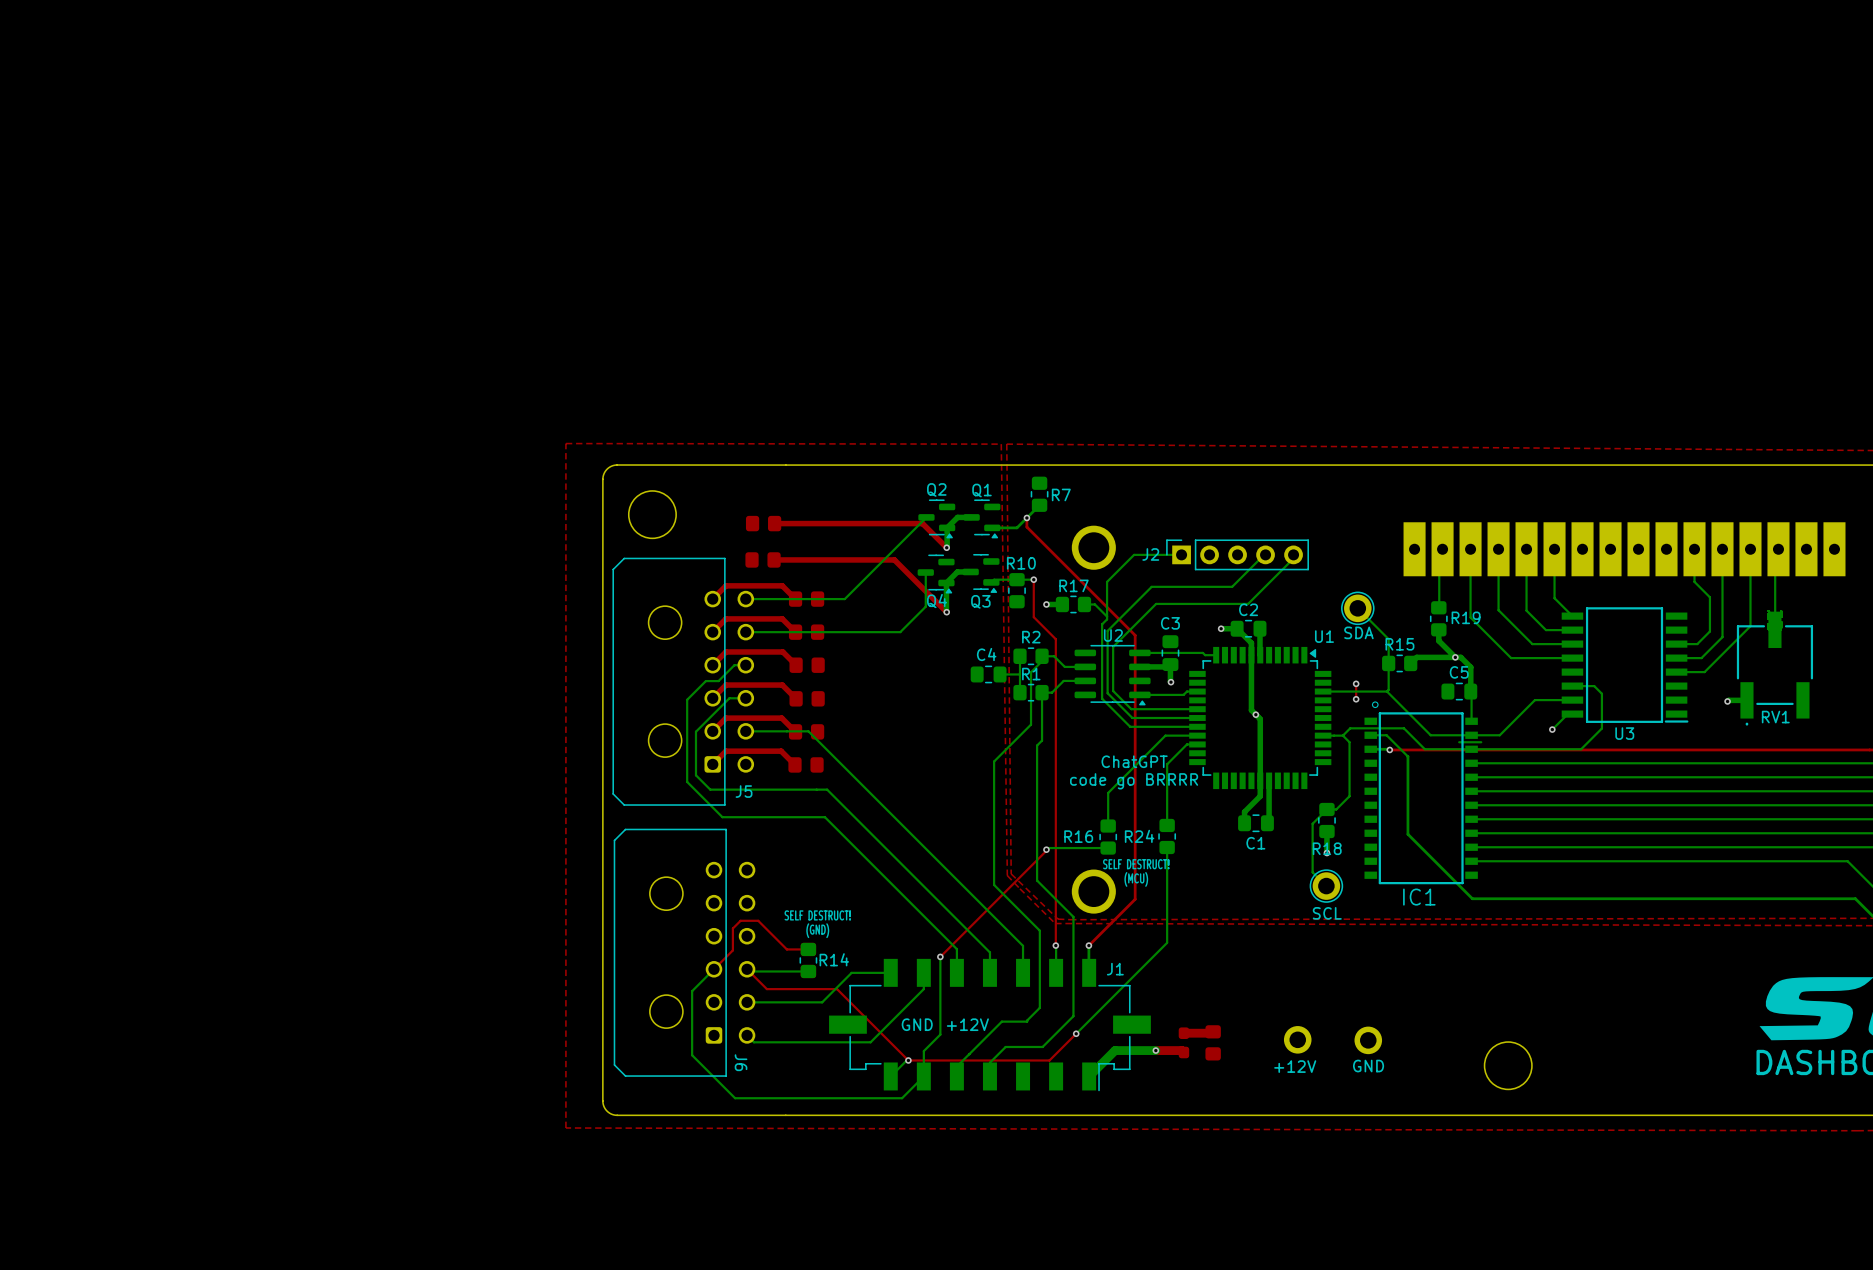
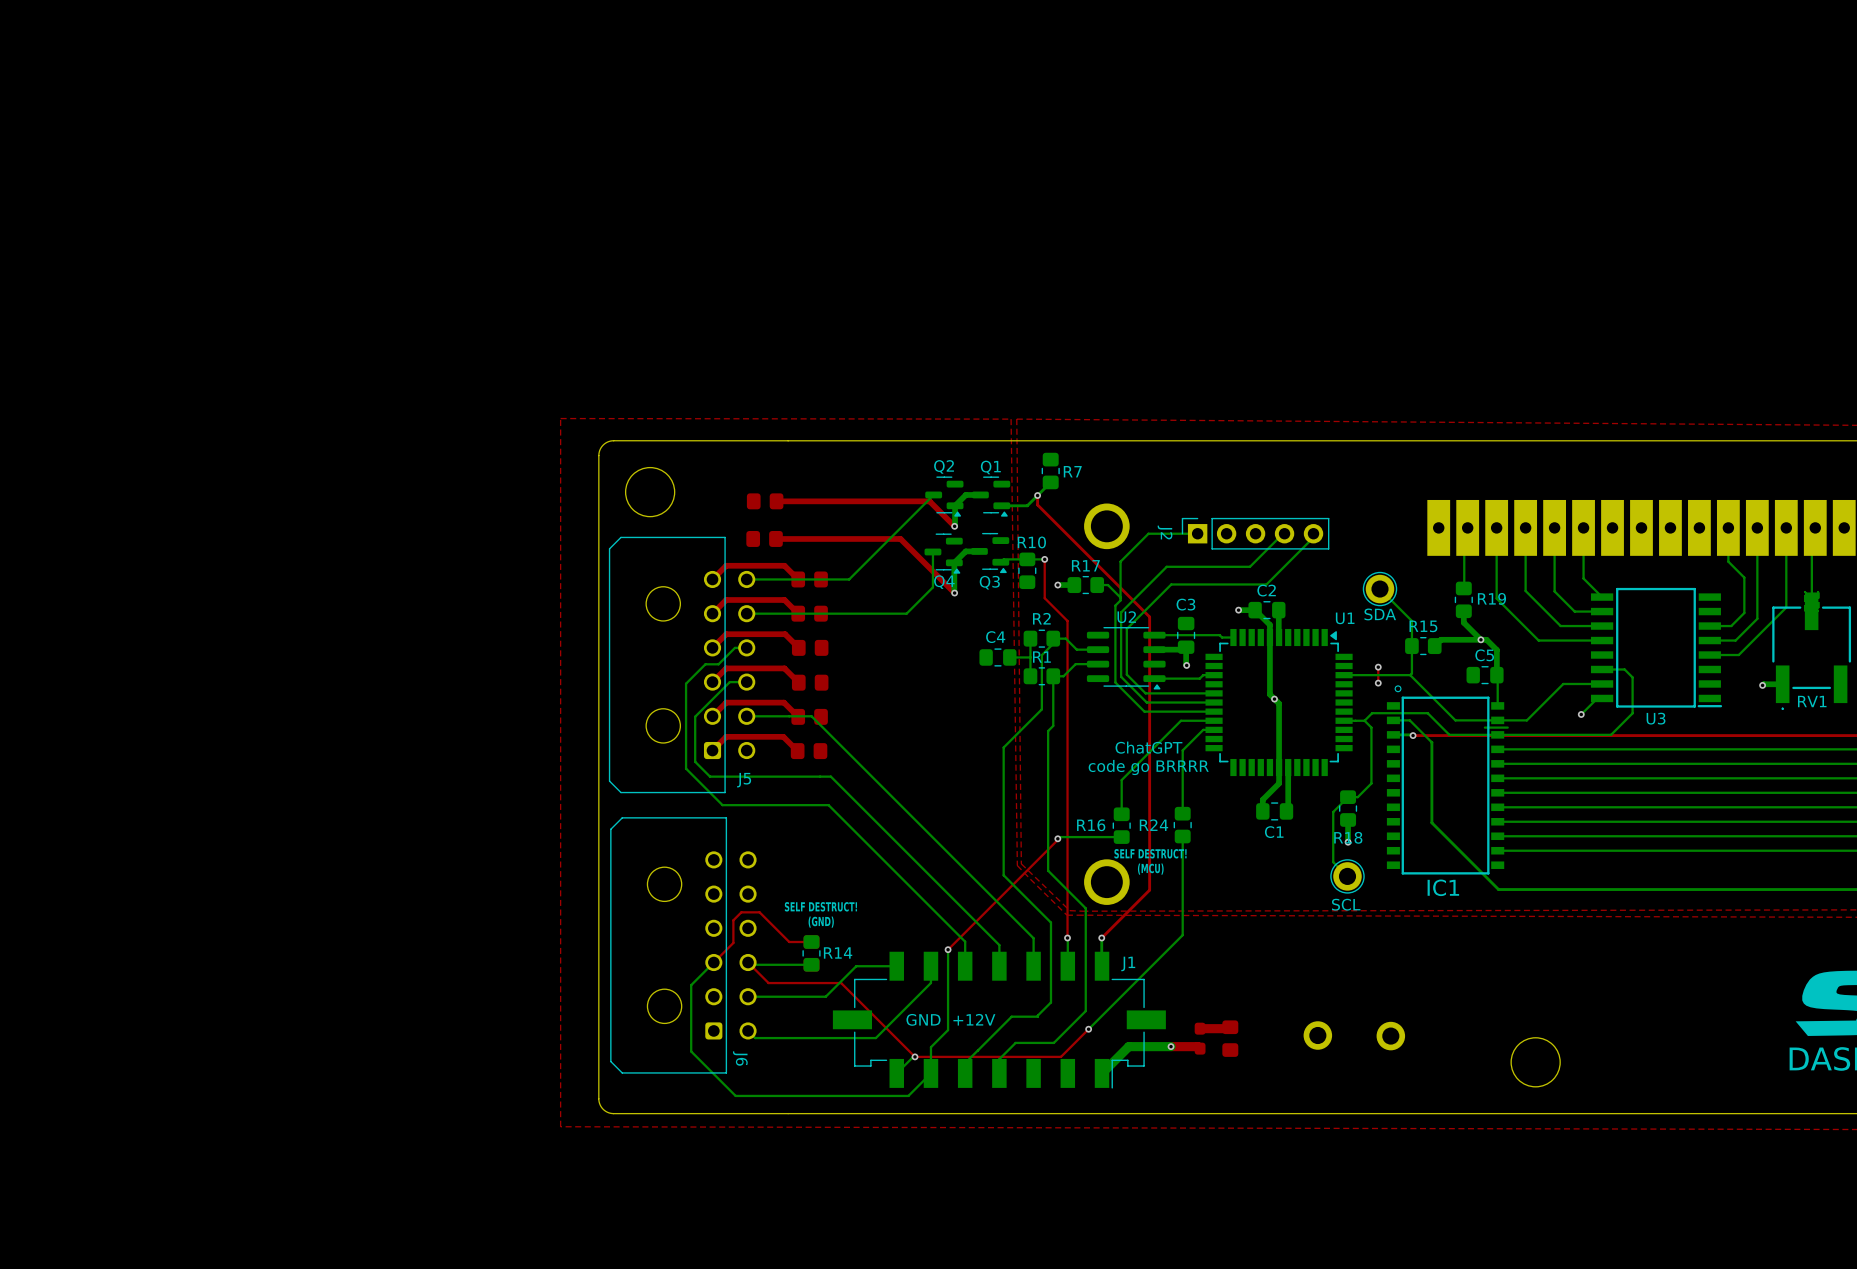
J2 name rotation: 0° (1150, 554) -> 90° clockwise (1165, 532)
text: +12V (1295, 1066) -> none
text: GND (1368, 1066) -> none

